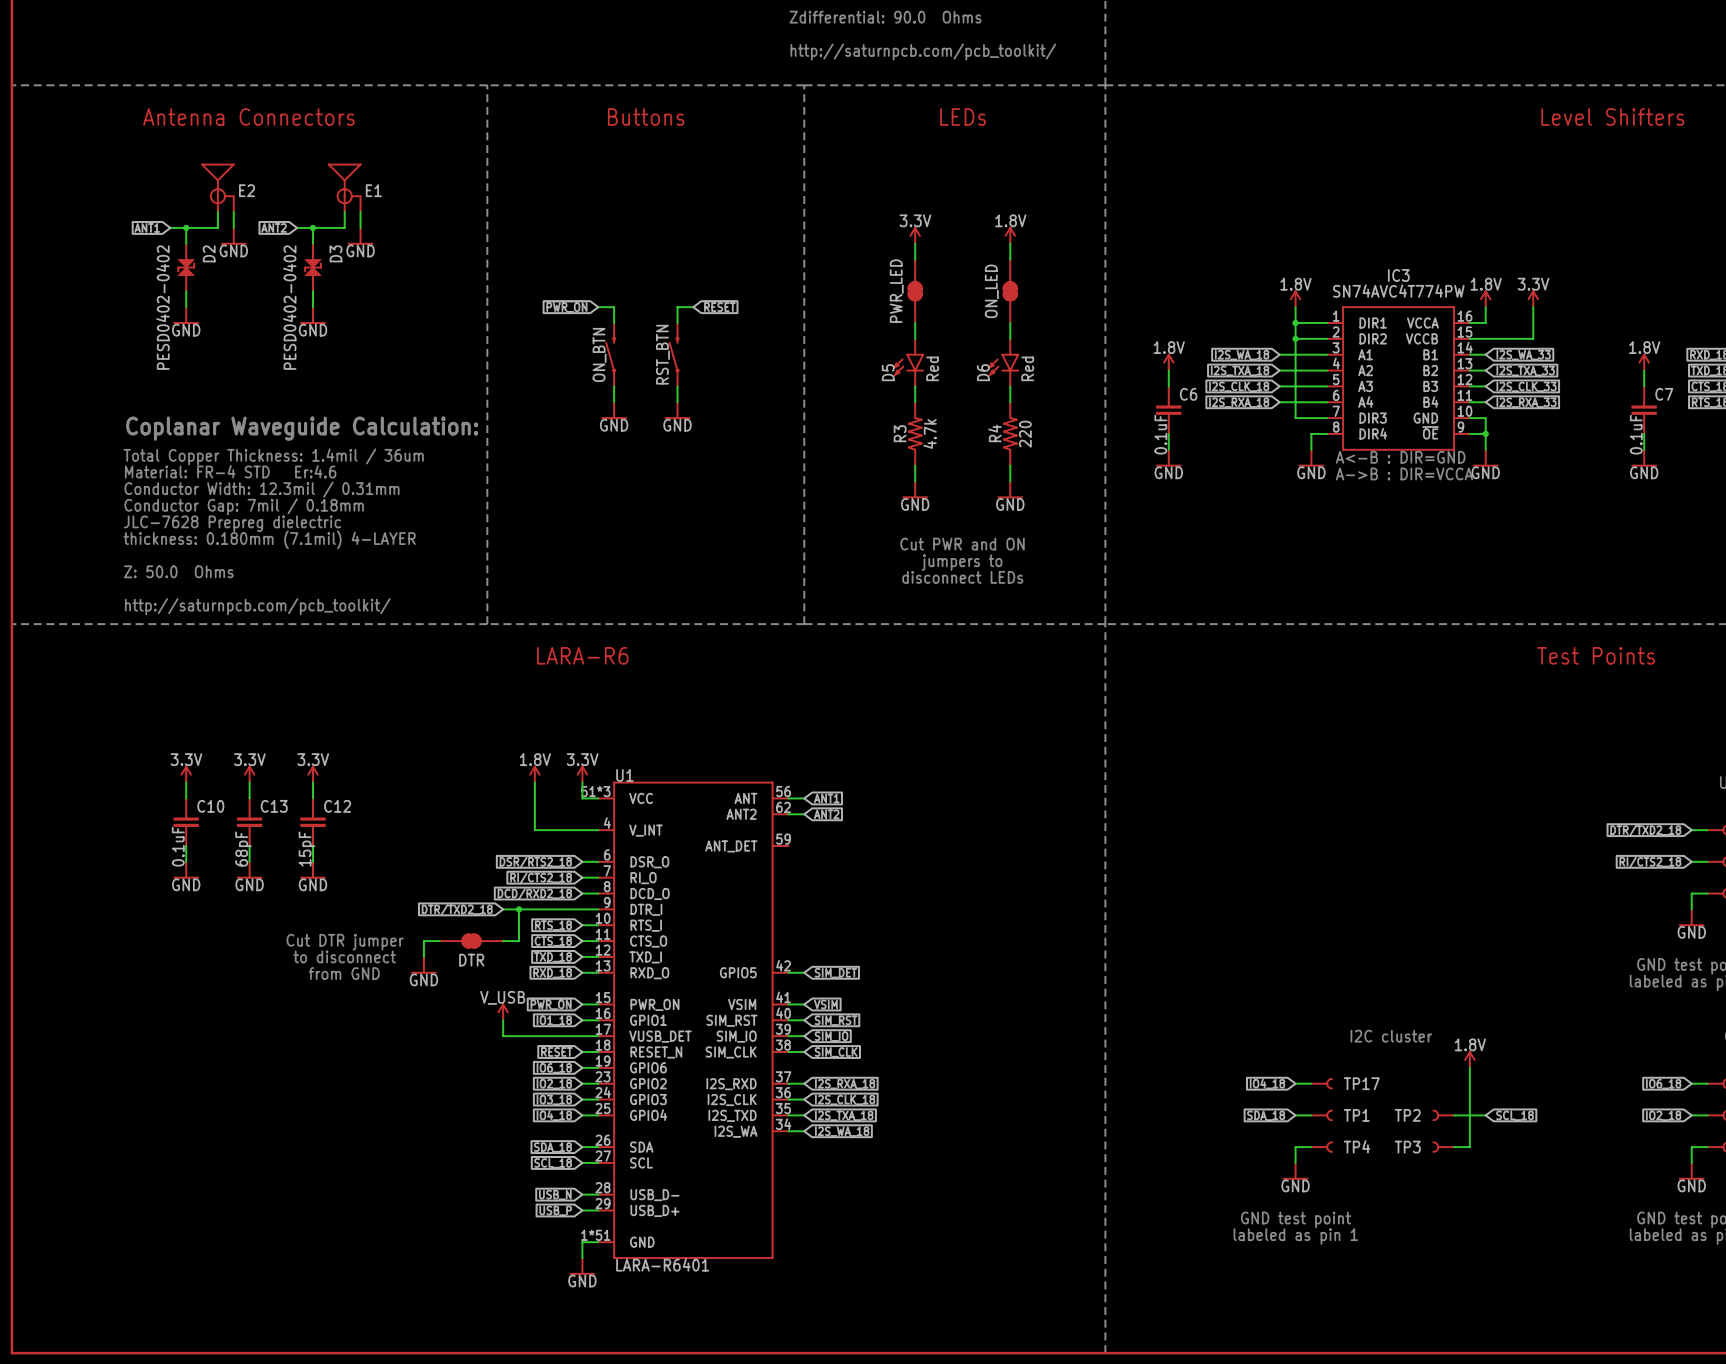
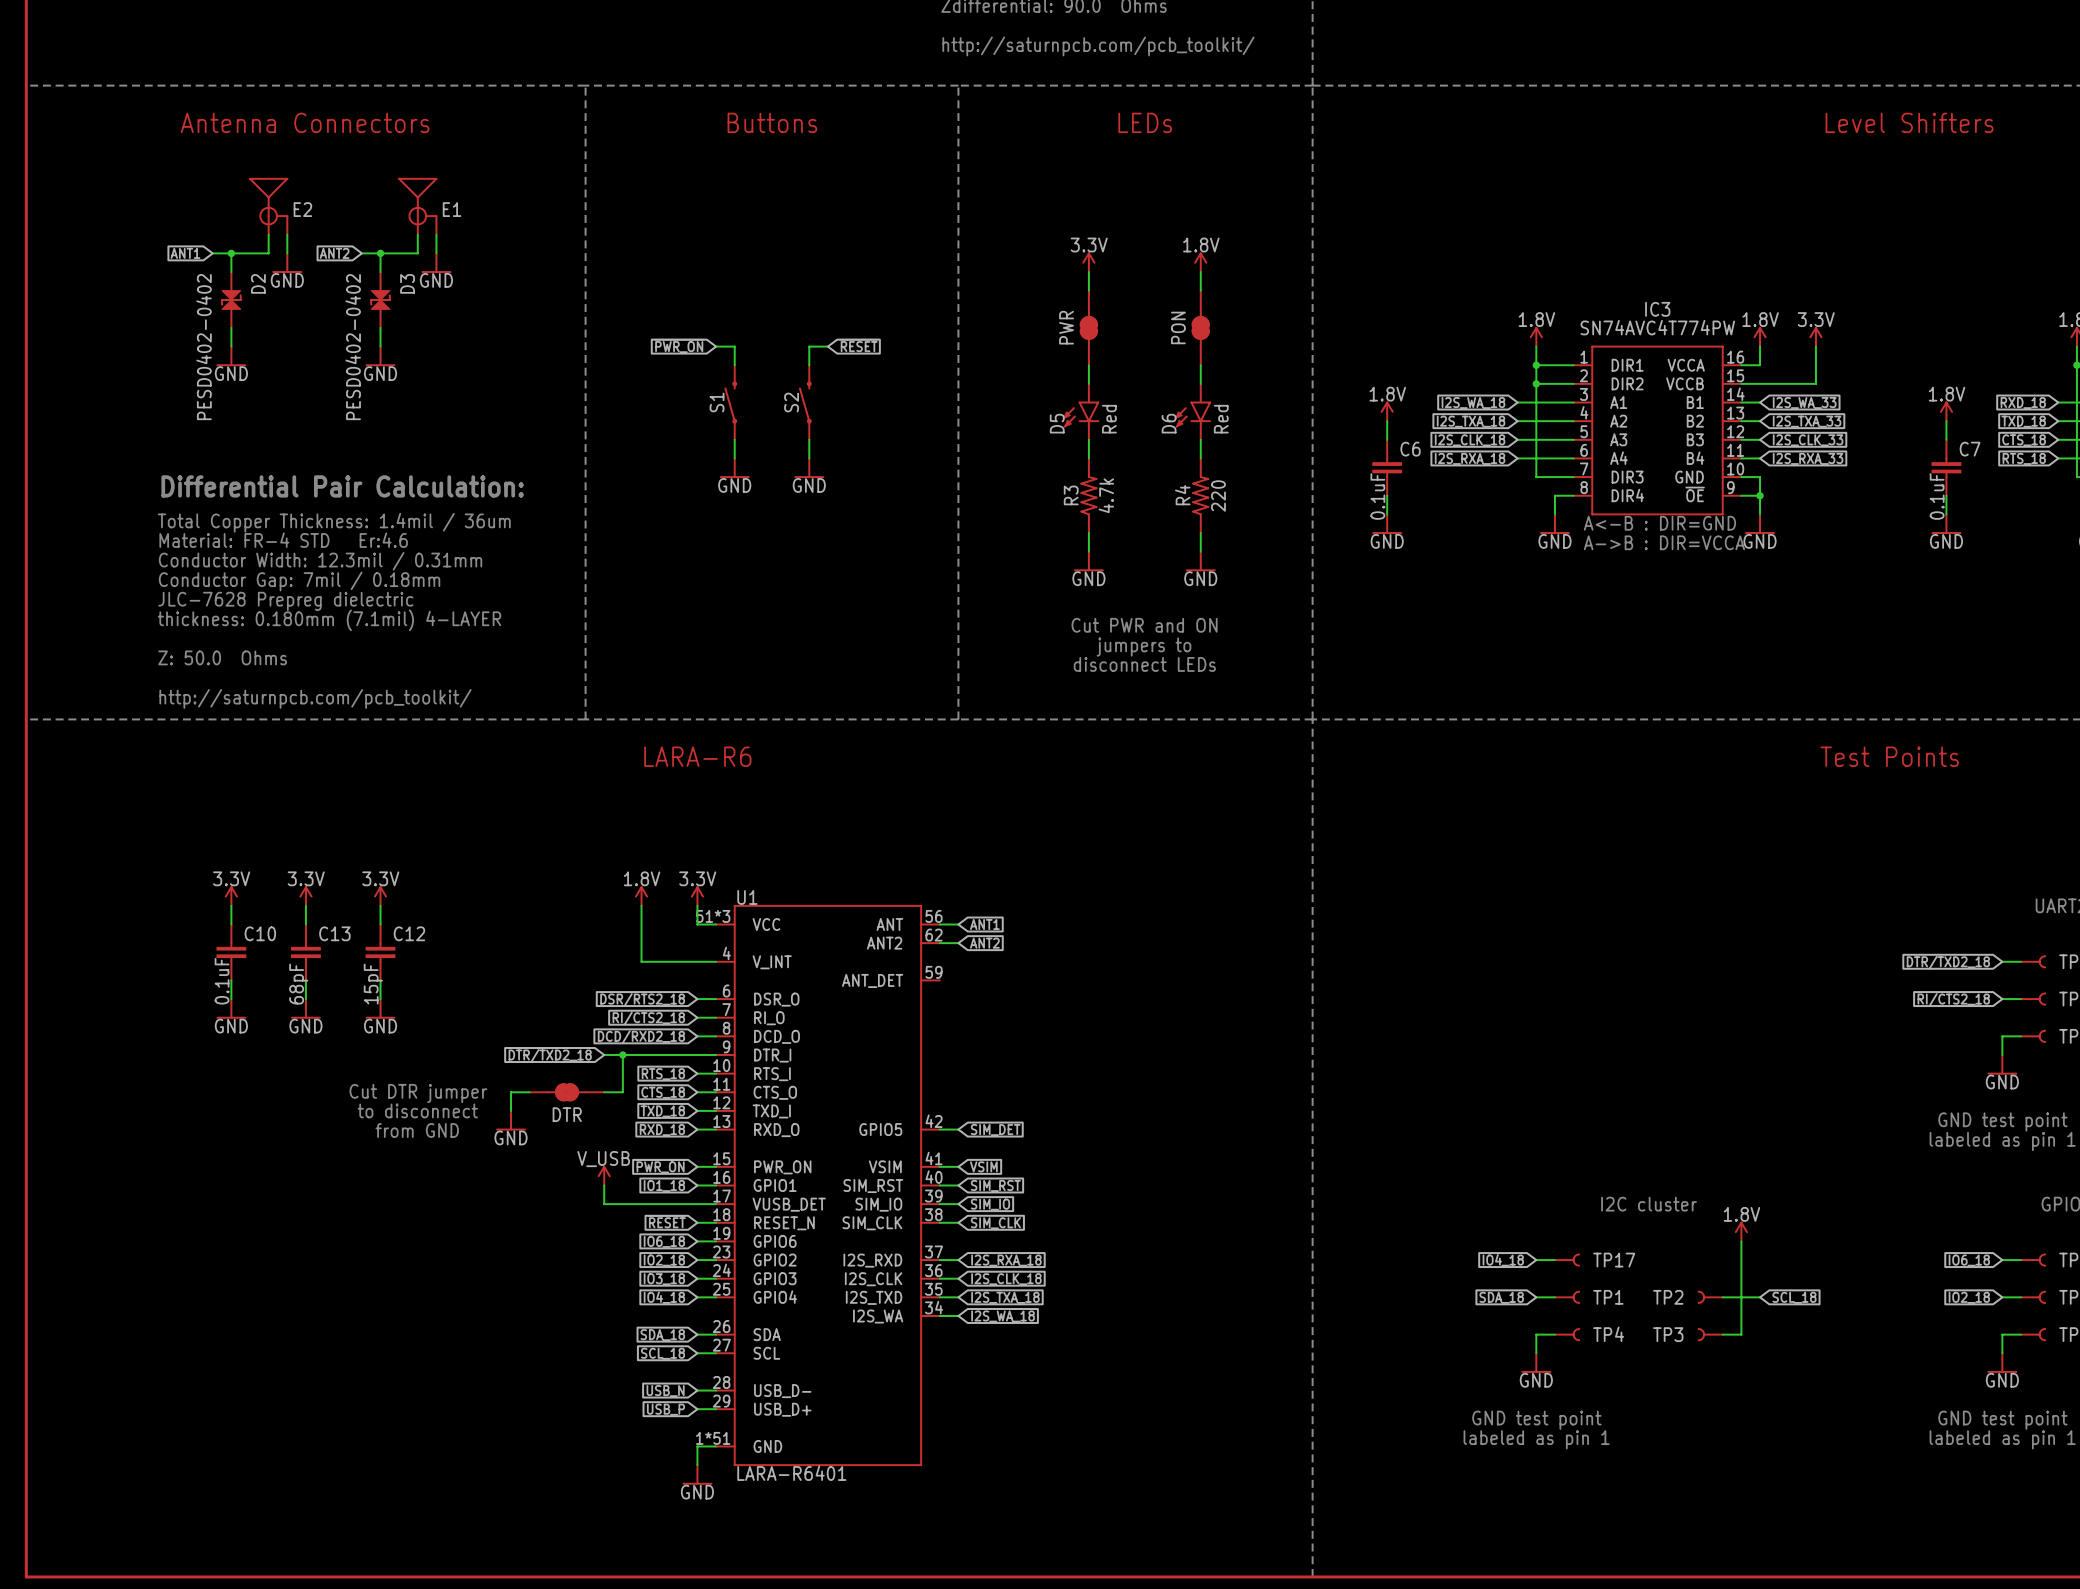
PWR_LED name: PWR_LED (896, 291) -> PWR (1066, 327)
ON_LED name: ON_LED (991, 291) -> PON (1178, 327)
ON_BTN name: ON_BTN (599, 354) -> S1 (717, 402)
RST_BTN name: RST_BTN (662, 354) -> S2 (791, 402)
text: Coplanar Waveguide Calculation: (302, 428) -> Differential Pair Calculation: (342, 486)

